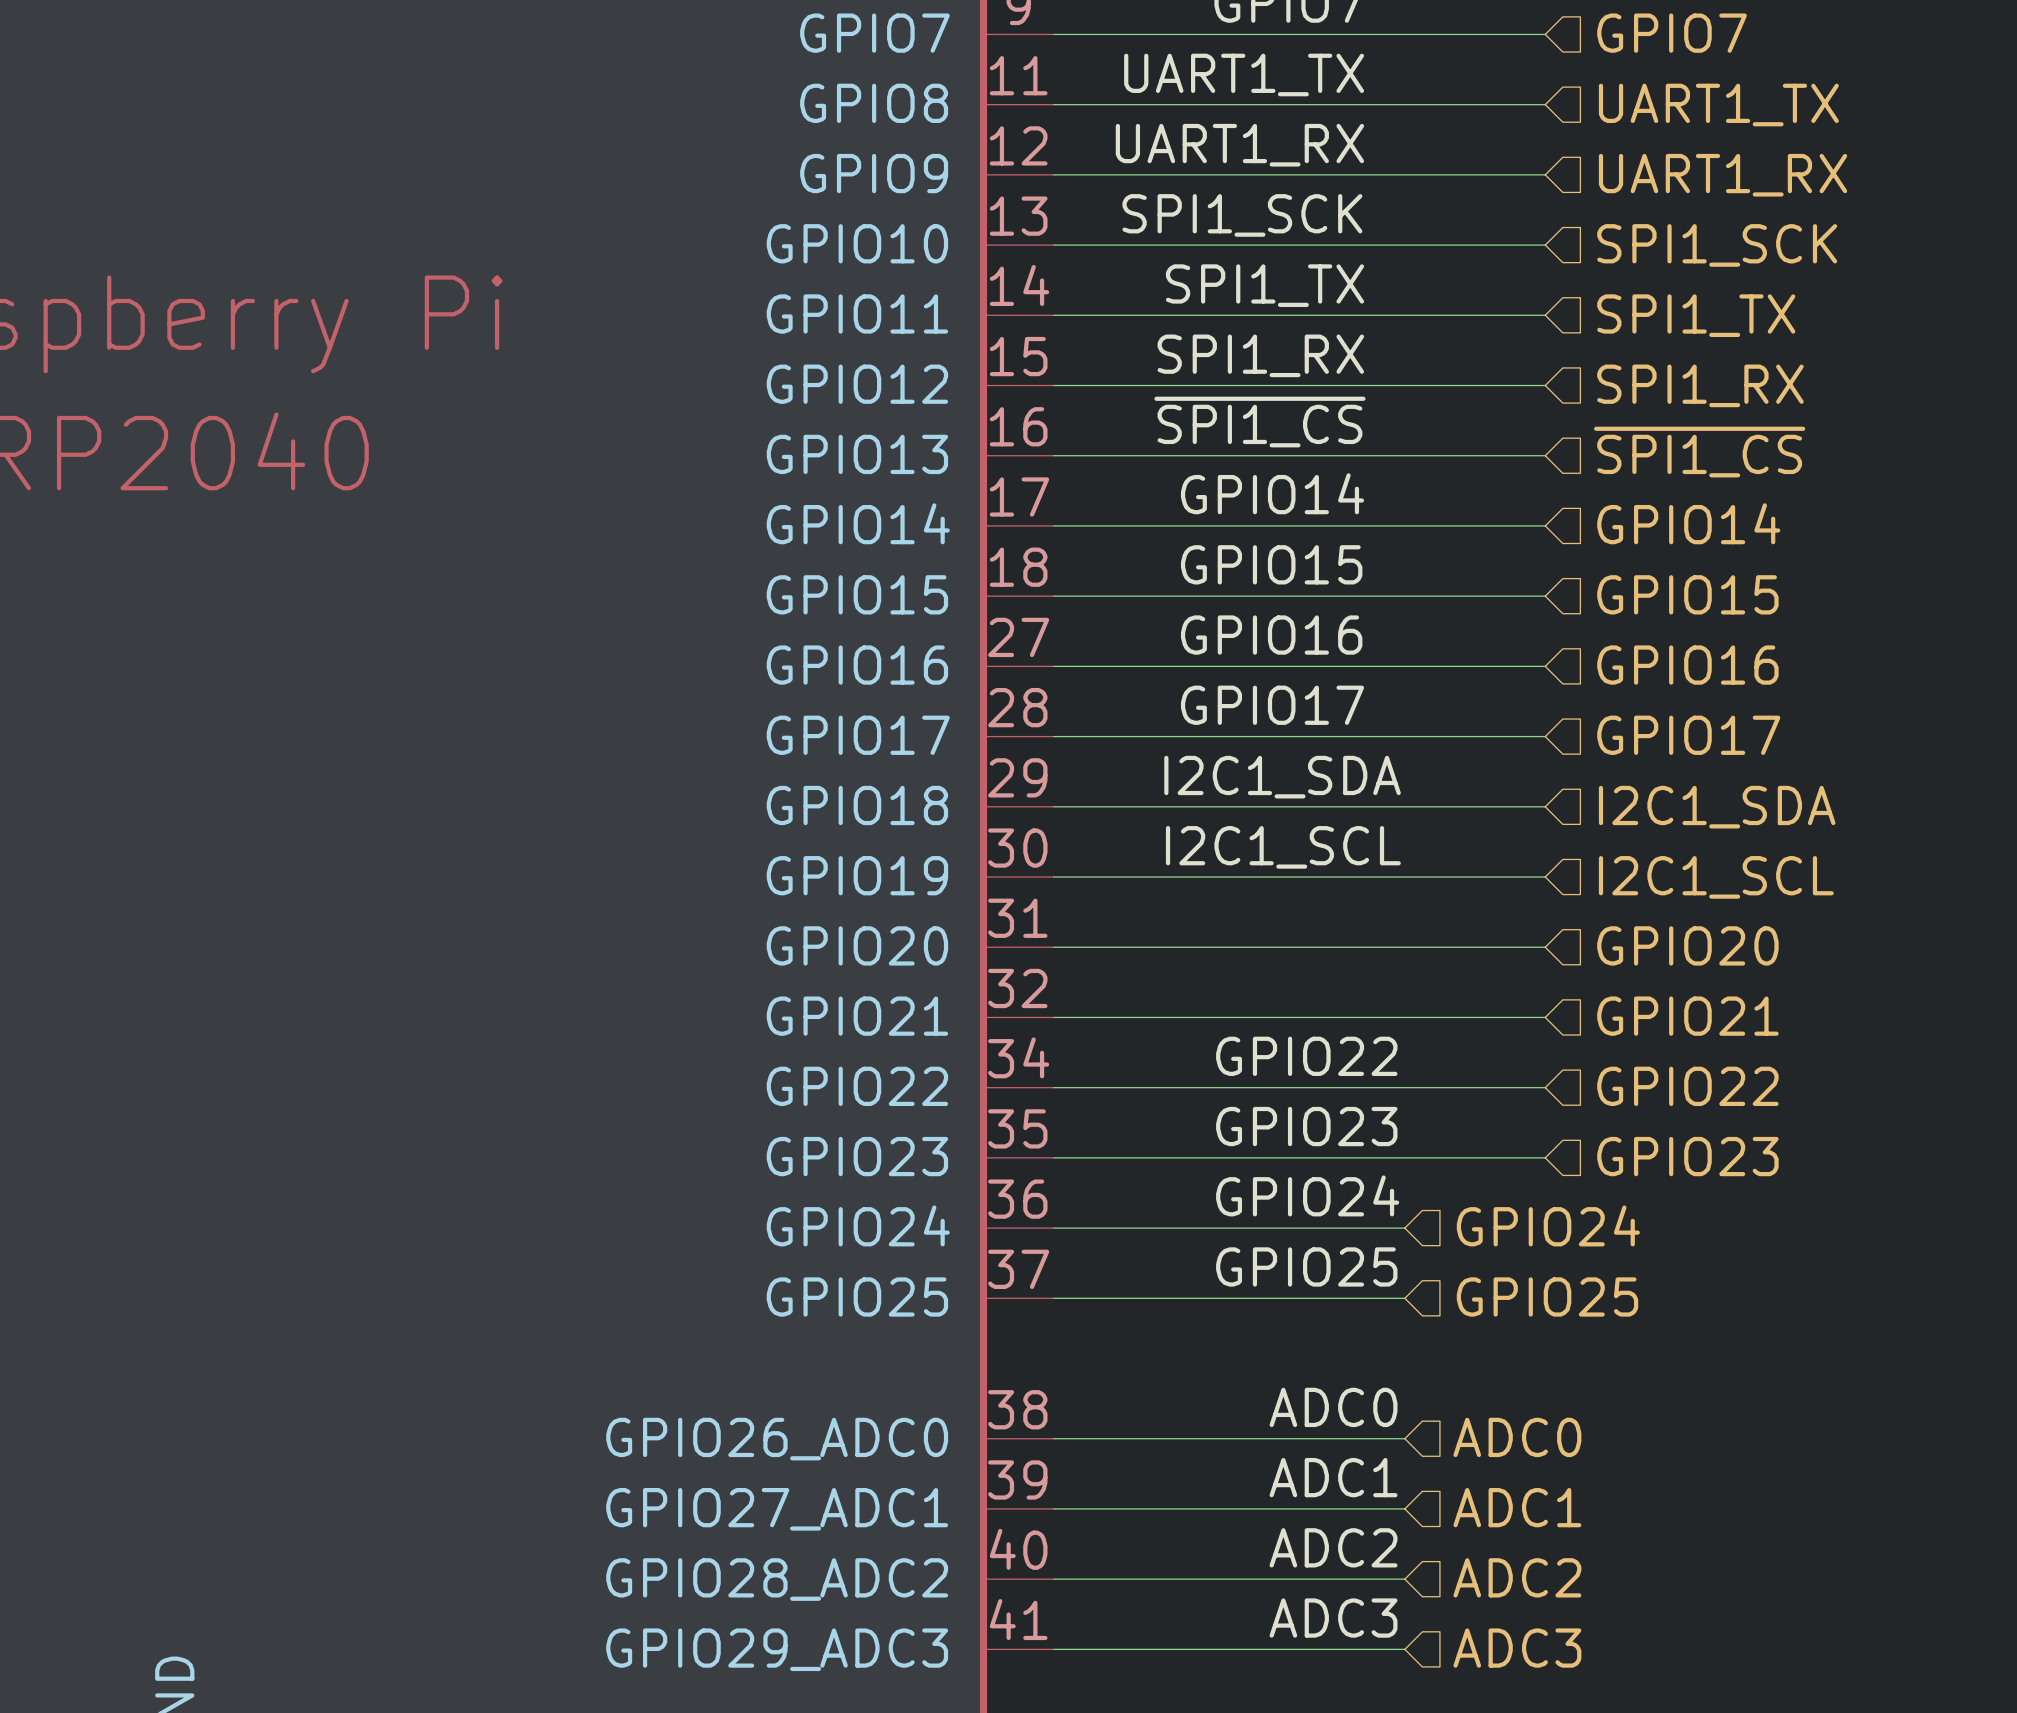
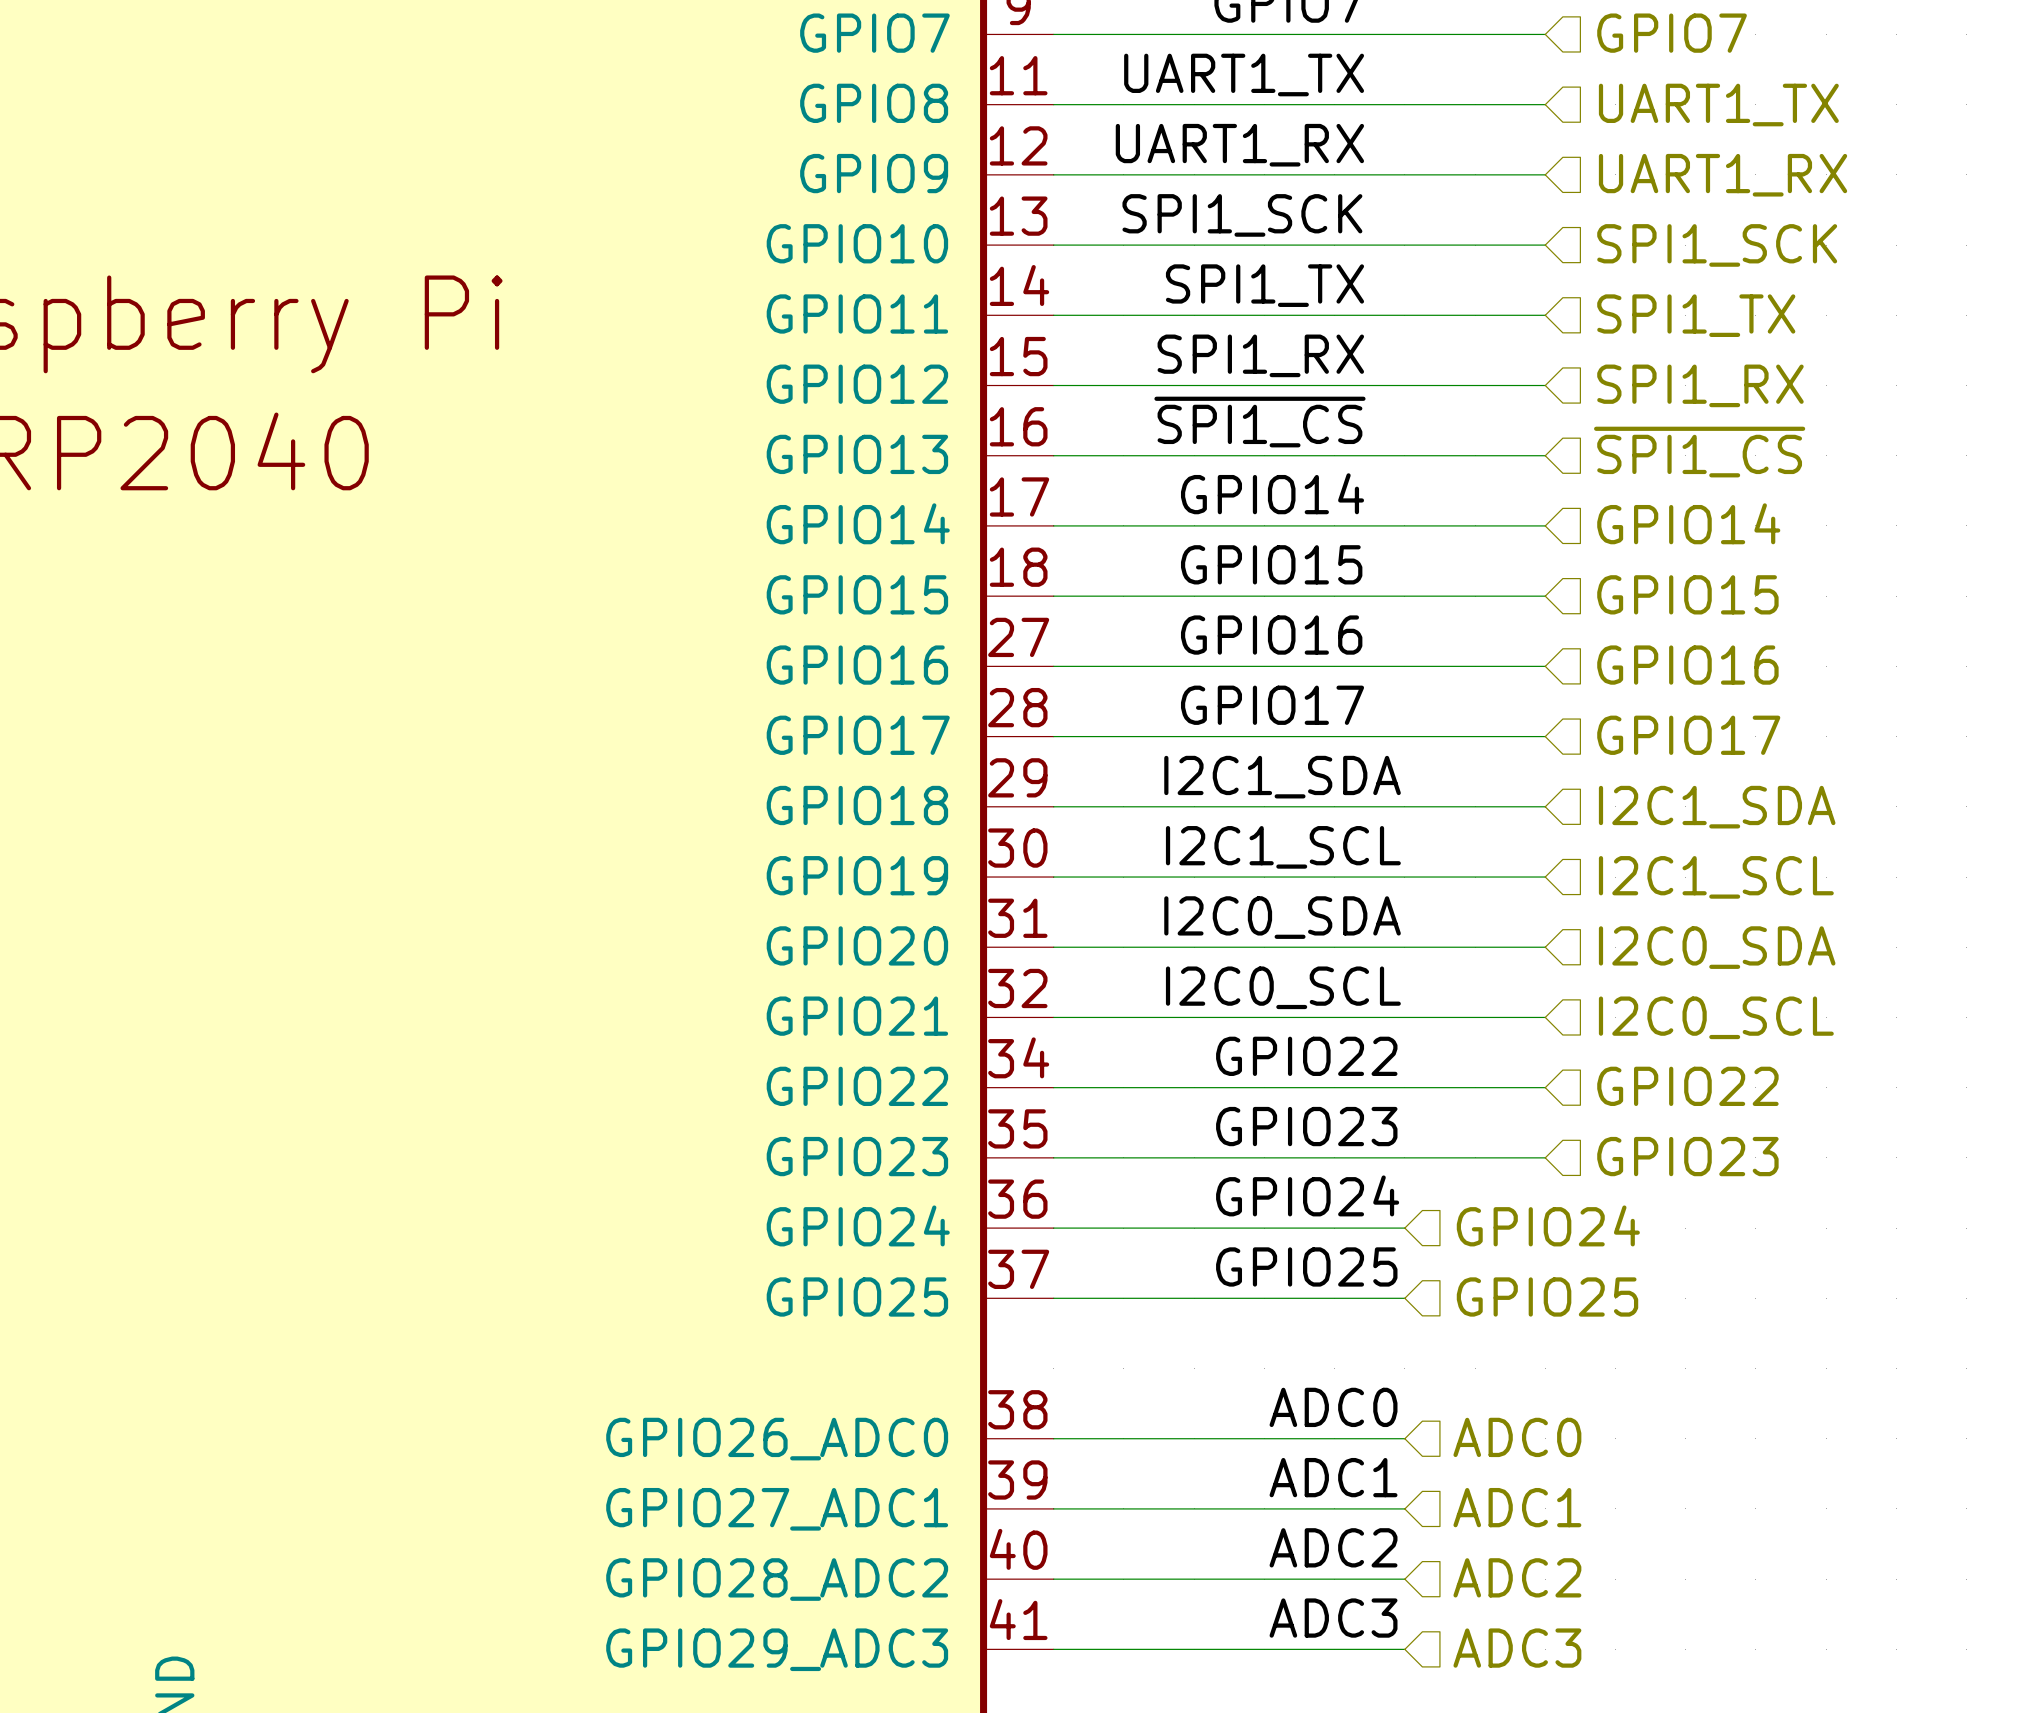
label: none -> I2C0_SDA (1282, 917)
hierarchical label: GPIO20 (1687, 945) -> I2C0_SDA (1717, 947)
label: none -> I2C0_SCL (1283, 987)
hierarchical label: GPIO21 (1687, 1016) -> I2C0_SCL (1716, 1017)

